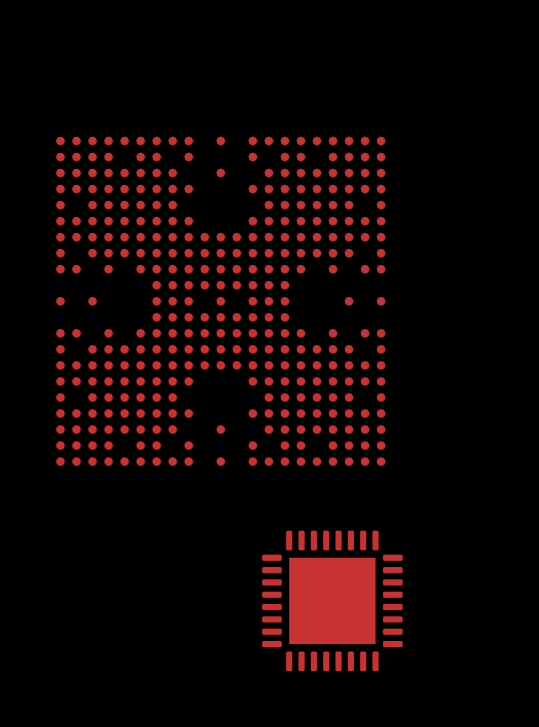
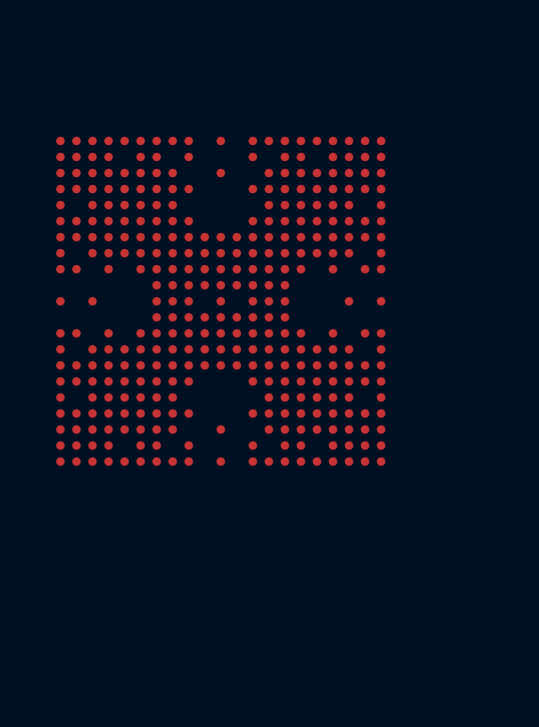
part: (332, 600) -> none

